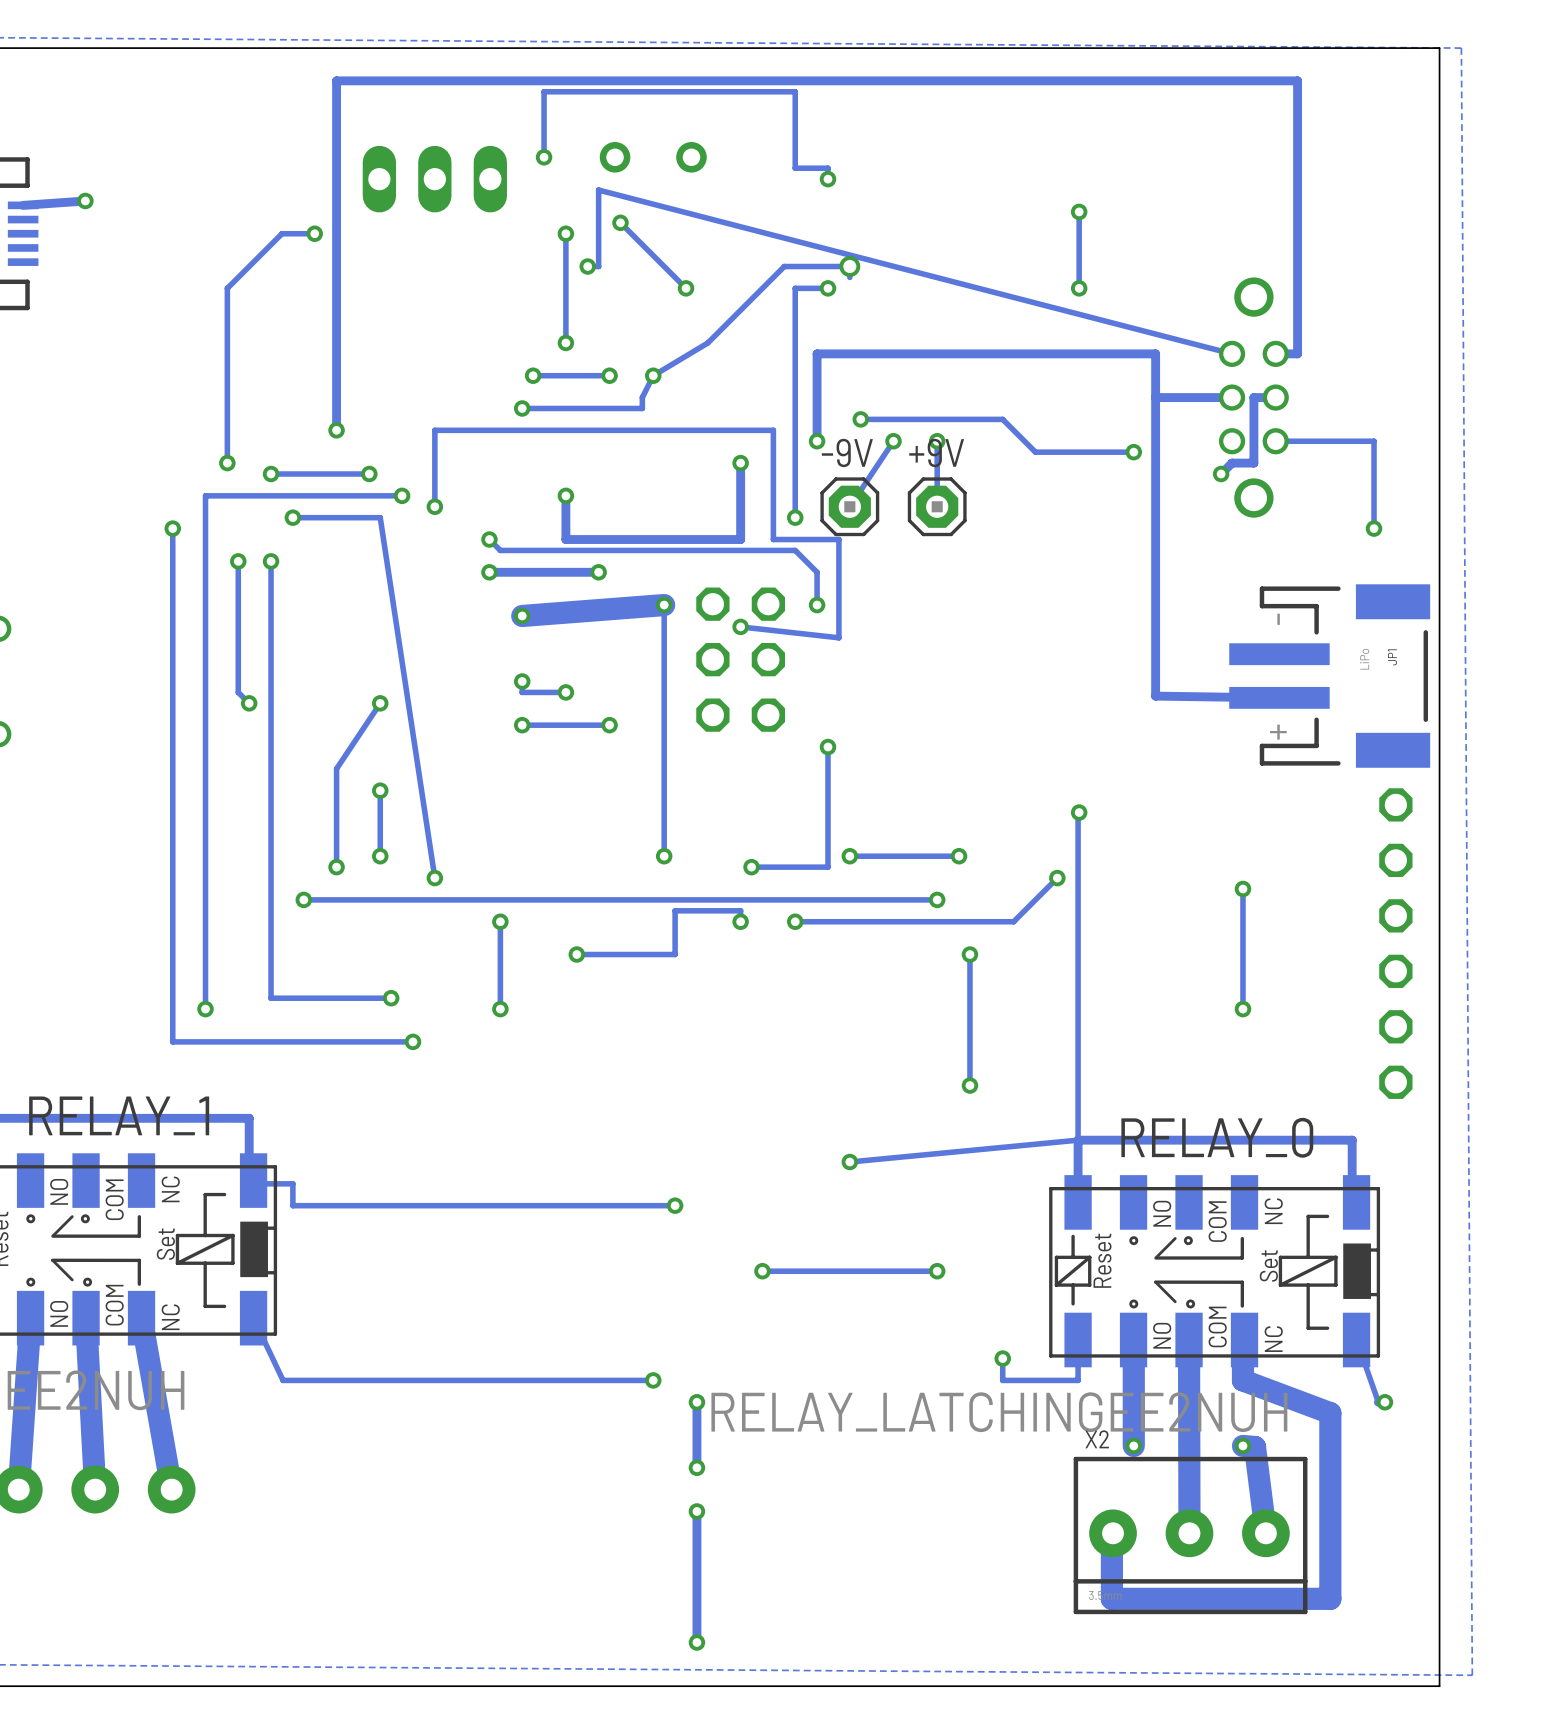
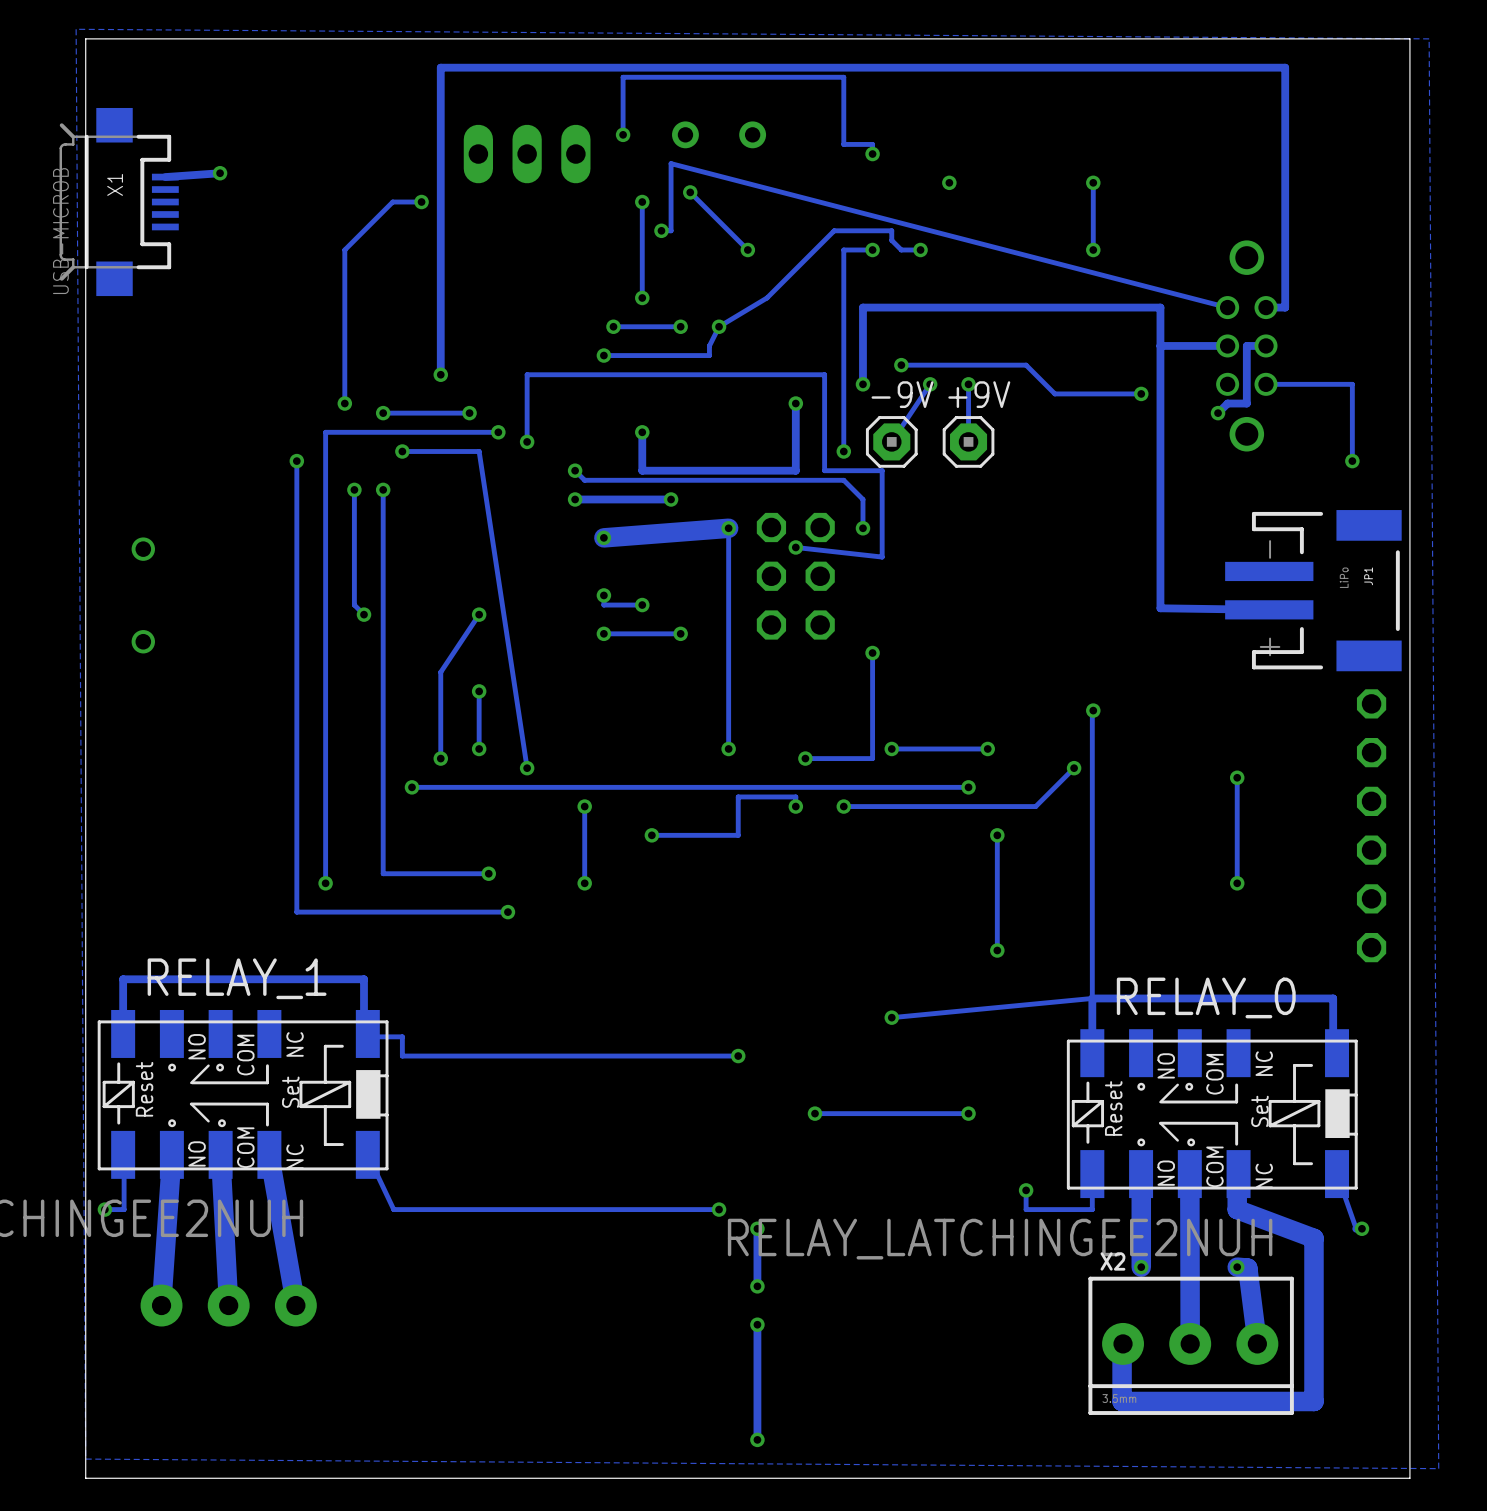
via: none -> (949, 182)
via: (849, 266) -> none
track: none -> (891, 240) (901, 249) (920, 249)
via: none -> (920, 249)

